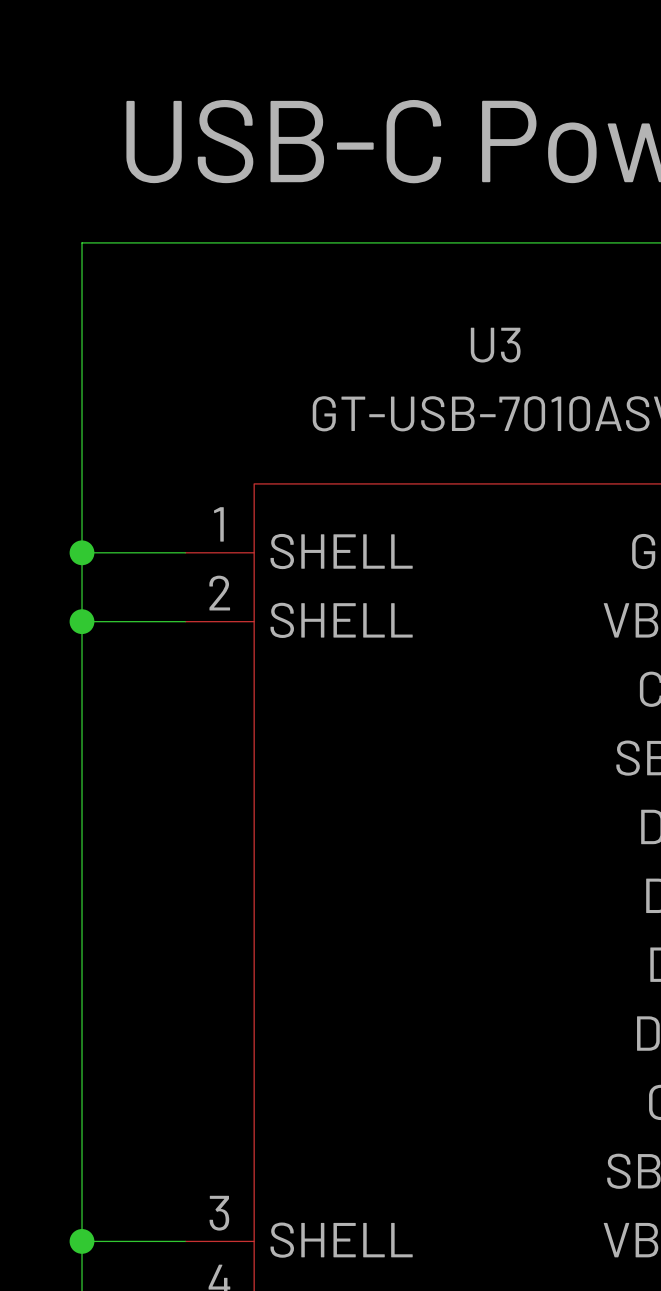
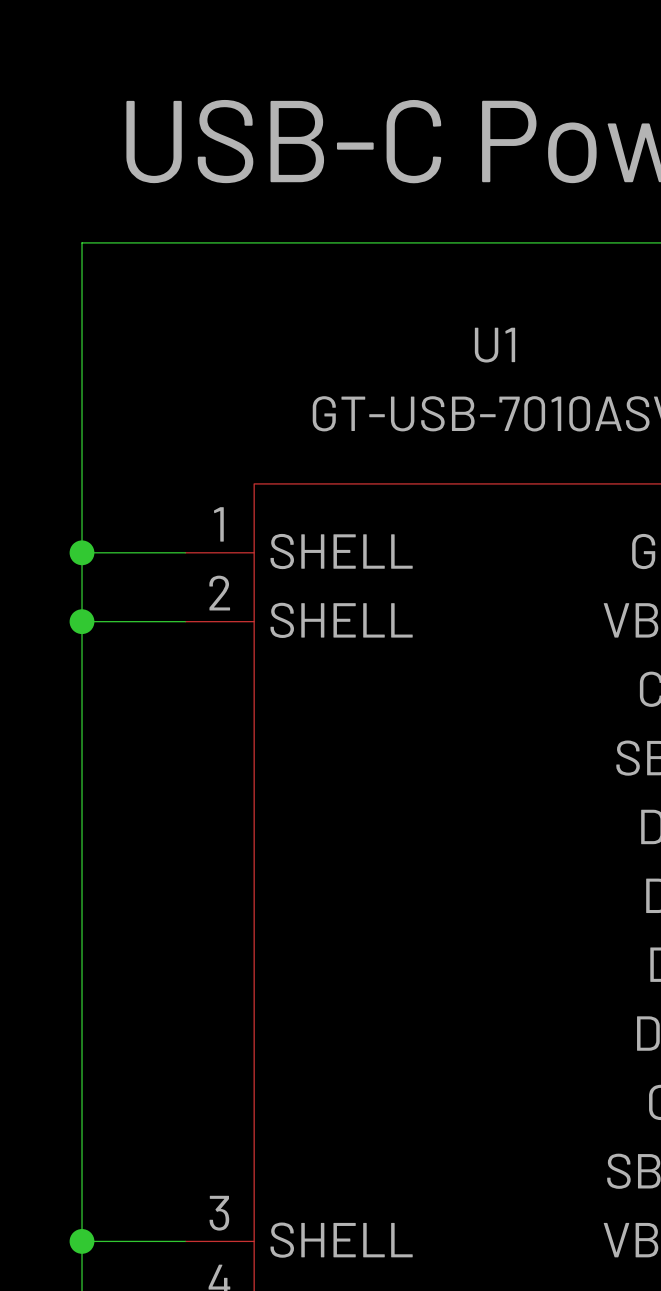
U3 name: U3 (495, 345) -> U1 (495, 345)

